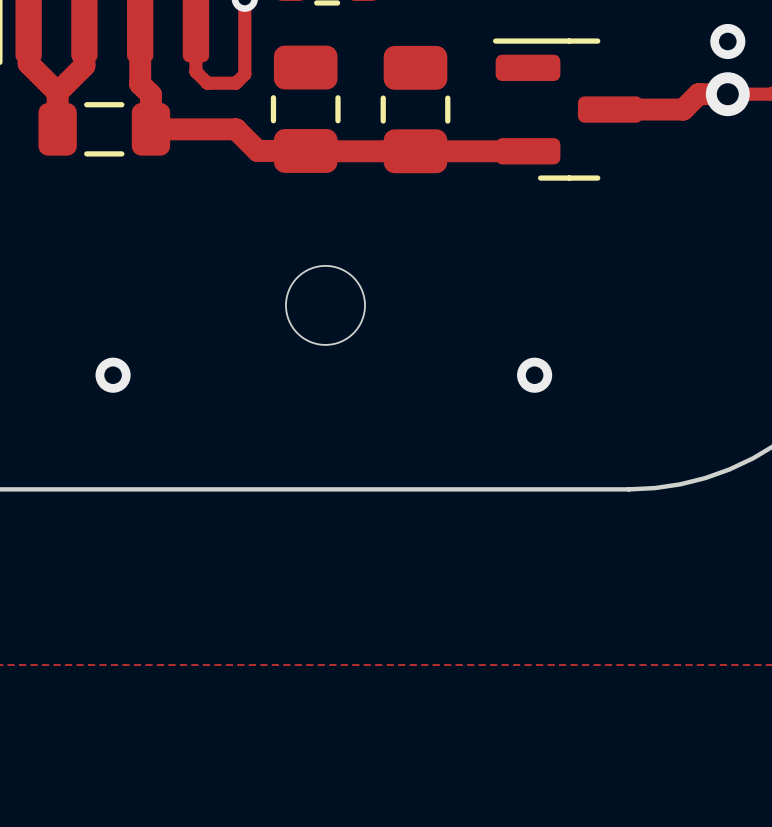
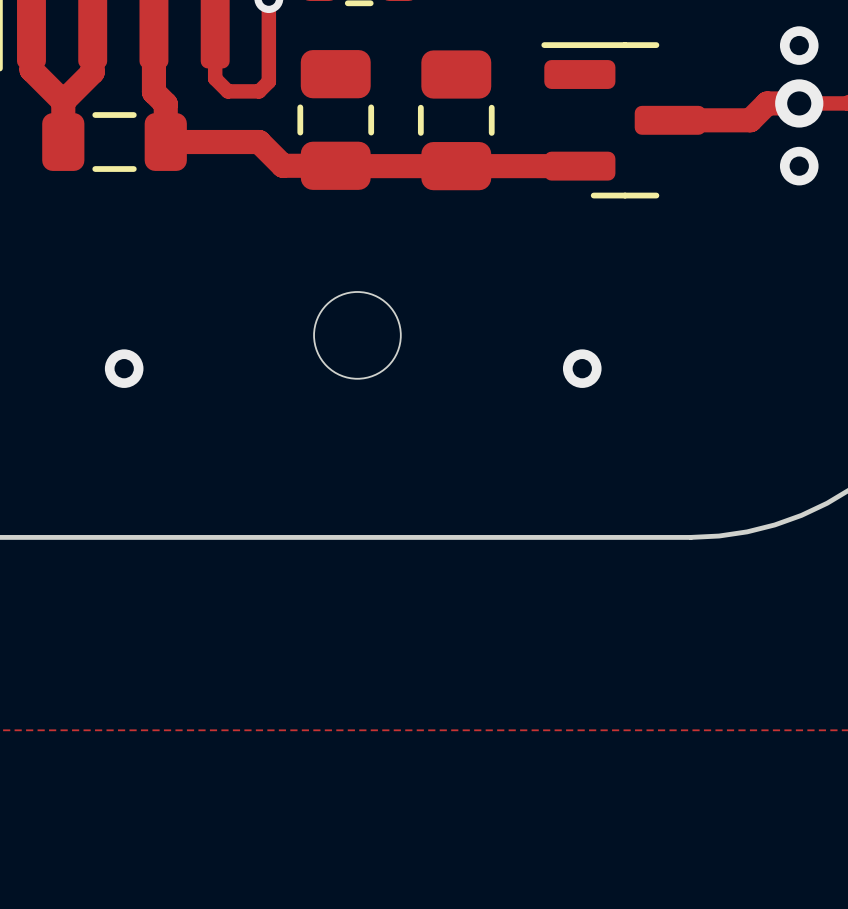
via: none -> (799, 166)
via position: (113, 375) -> (124, 368)
via position: (534, 375) -> (582, 368)

